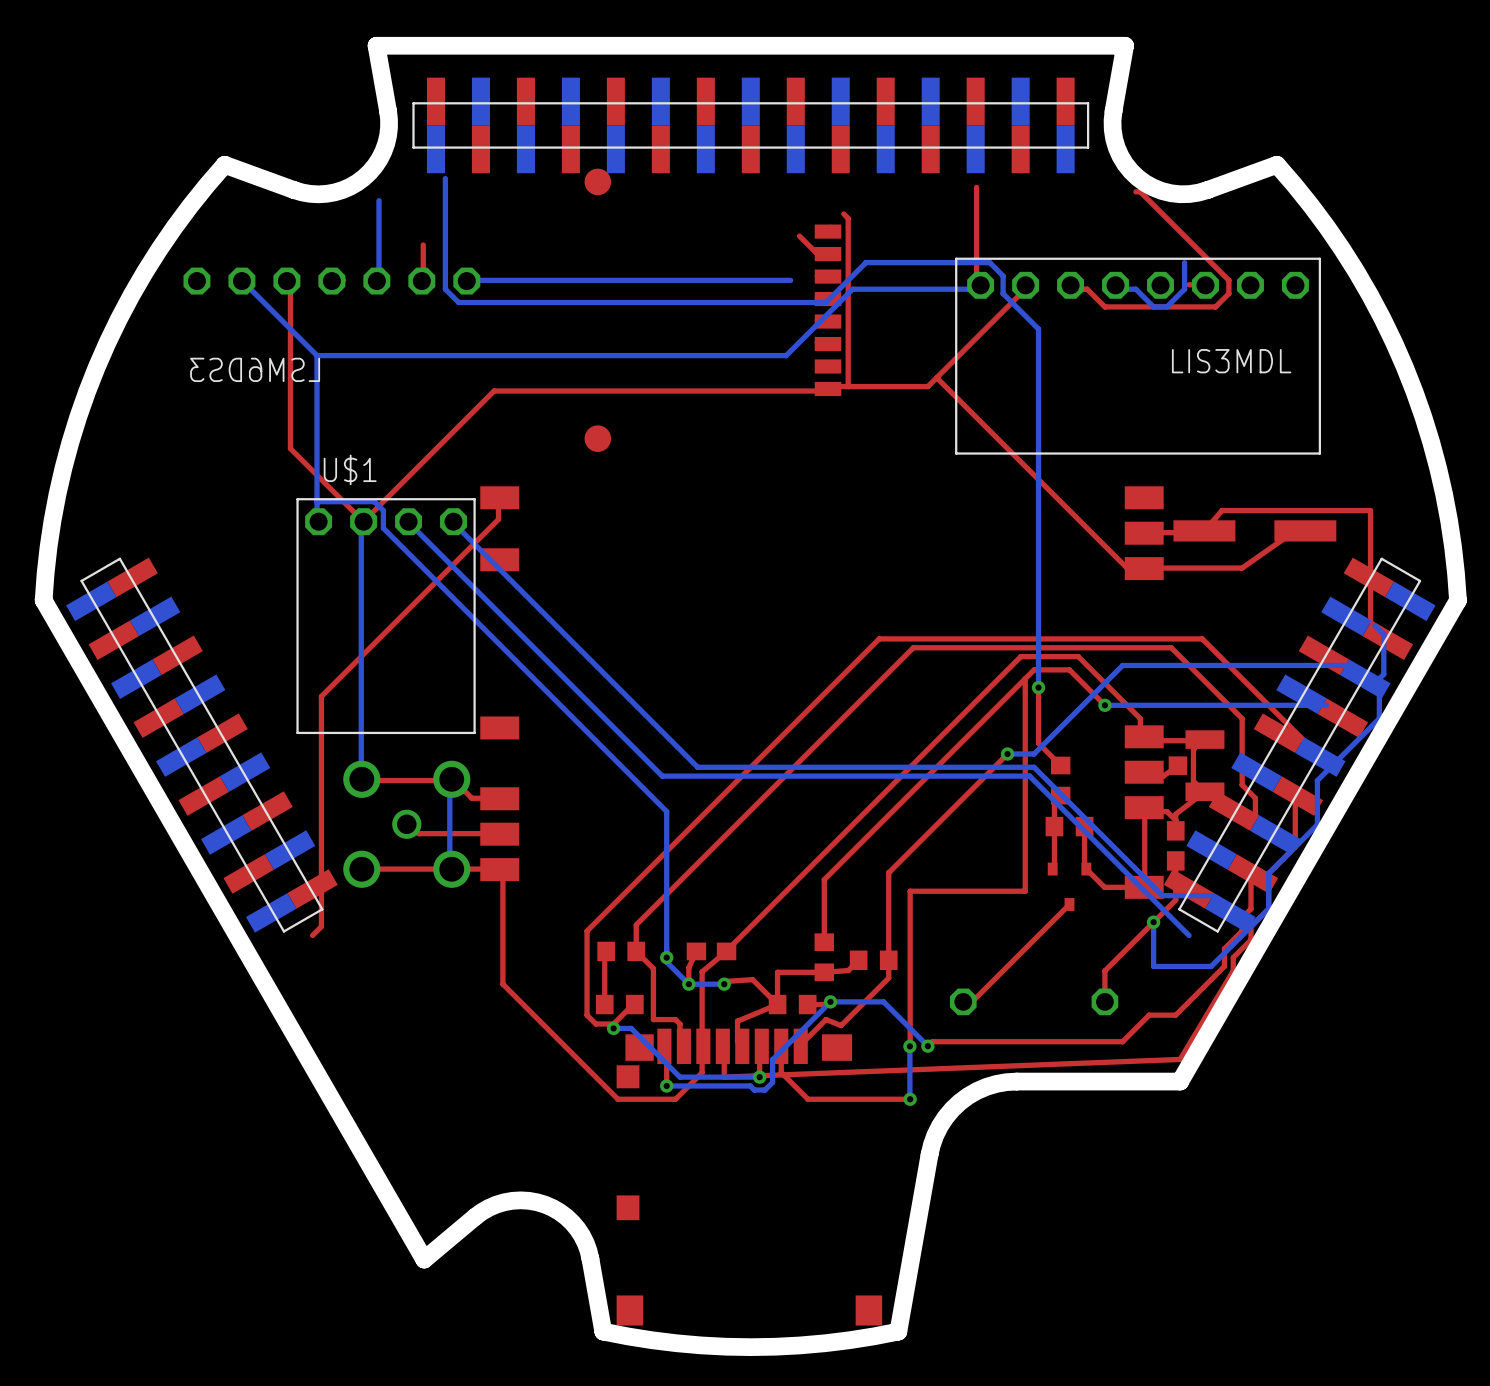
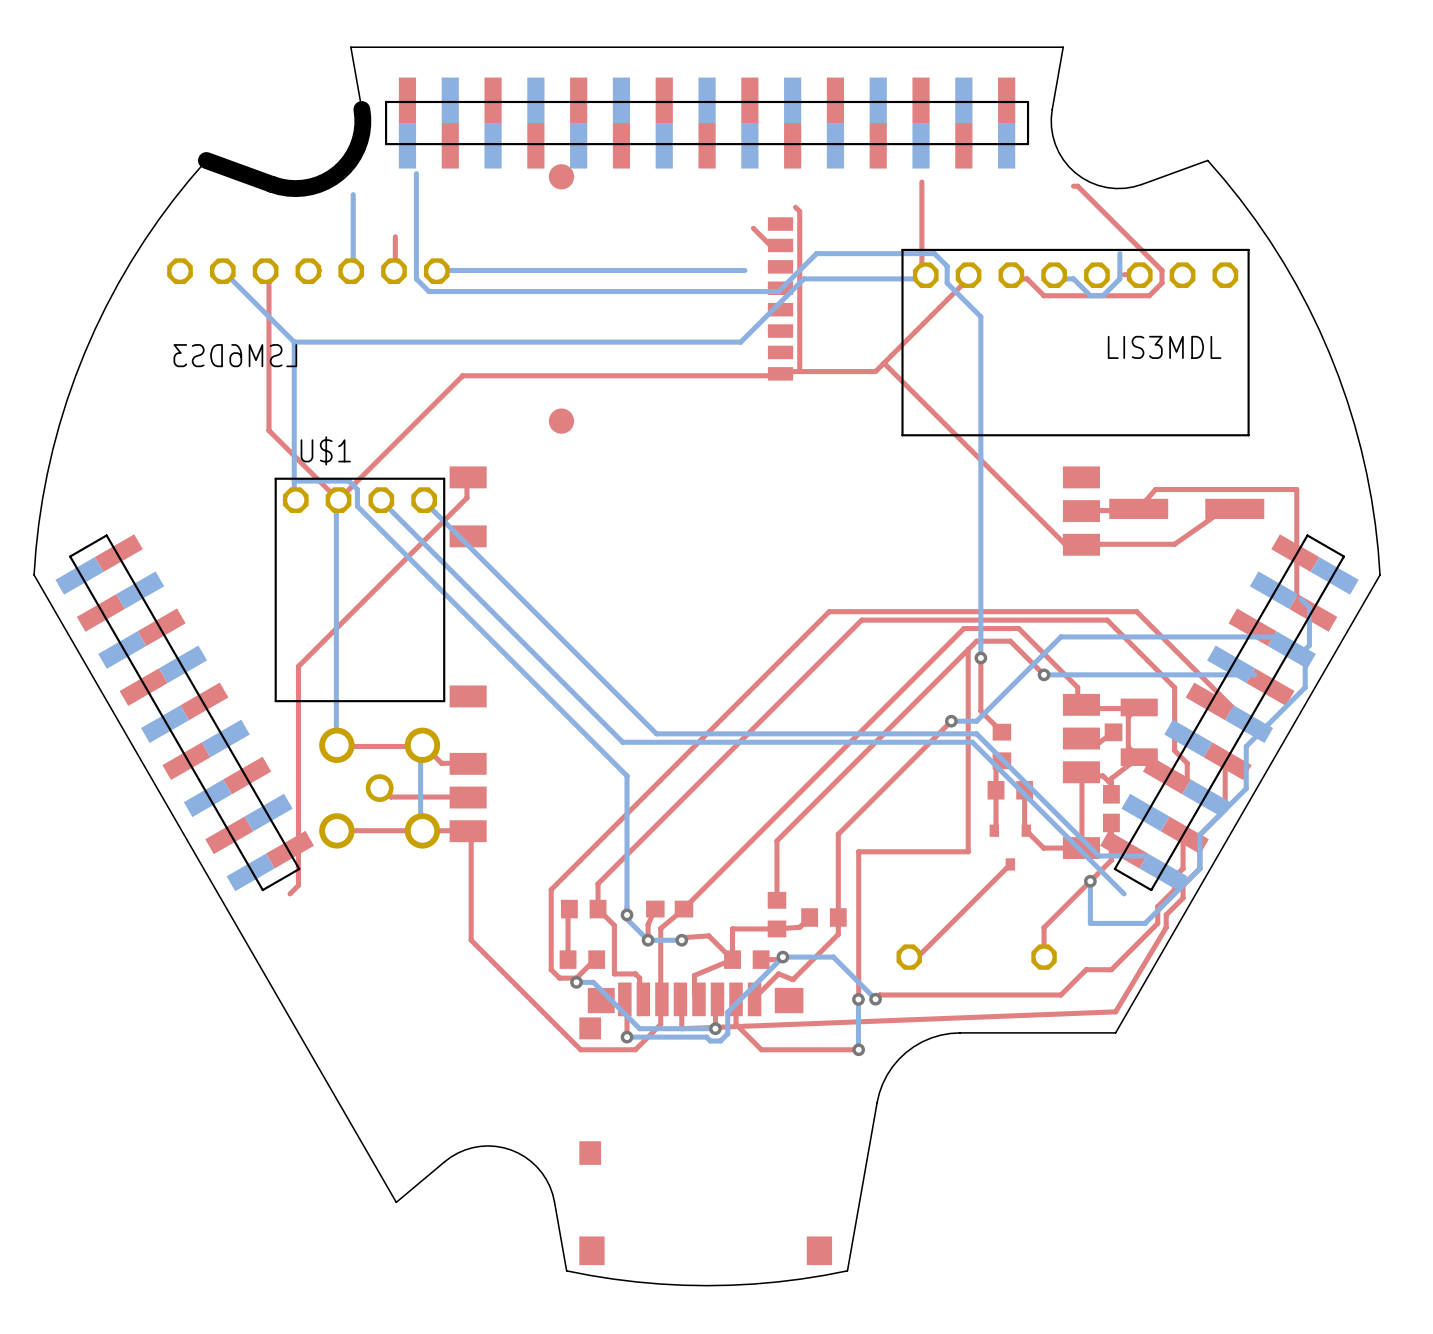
board edge width: thick (388, 111) (376, 45) (1125, 45) (1113, 111) (1112, 129) (1120, 156) (1131, 171) (1153, 187) (1170, 193) (1189, 194) (1207, 190) (1276, 164) (1311, 205) (1342, 249) (1382, 318) (1404, 367) (1423, 417) (1444, 494) (1453, 547) (1457, 600) (1180, 1081) (1006, 1082) (976, 1090) (959, 1102) (945, 1117) (935, 1135) (929, 1154) (898, 1331) (824, 1343) (750, 1347) (676, 1343) (603, 1331) (590, 1258) (582, 1235) (572, 1222) (559, 1211) (544, 1204) (528, 1200) (504, 1202) (488, 1207) (475, 1216) (424, 1259) (43, 600) (48, 547) (57, 494) (78, 417) (96, 367) (119, 318) (159, 249) (190, 205) (224, 164) -> thin (361, 109) (350, 47) (1063, 47) (1052, 109) (1051, 127) (1058, 152) (1068, 166) (1090, 182) (1106, 187) (1124, 188) (1141, 184) (1207, 160) (1240, 199) (1269, 240) (1308, 306) (1329, 352) (1347, 400) (1366, 474) (1375, 524) (1380, 574) (1115, 1032) (950, 1033) (922, 1041) (905, 1052) (892, 1066) (882, 1083) (877, 1102) (847, 1270) (777, 1281) (707, 1285) (636, 1281) (566, 1270) (554, 1201) (546, 1179) (537, 1167) (525, 1157) (511, 1150) (495, 1146) (472, 1147) (457, 1153) (396, 1202) (34, 574) (38, 524) (47, 474) (66, 400) (84, 352) (105, 306) (144, 240) (173, 199) (206, 160)

